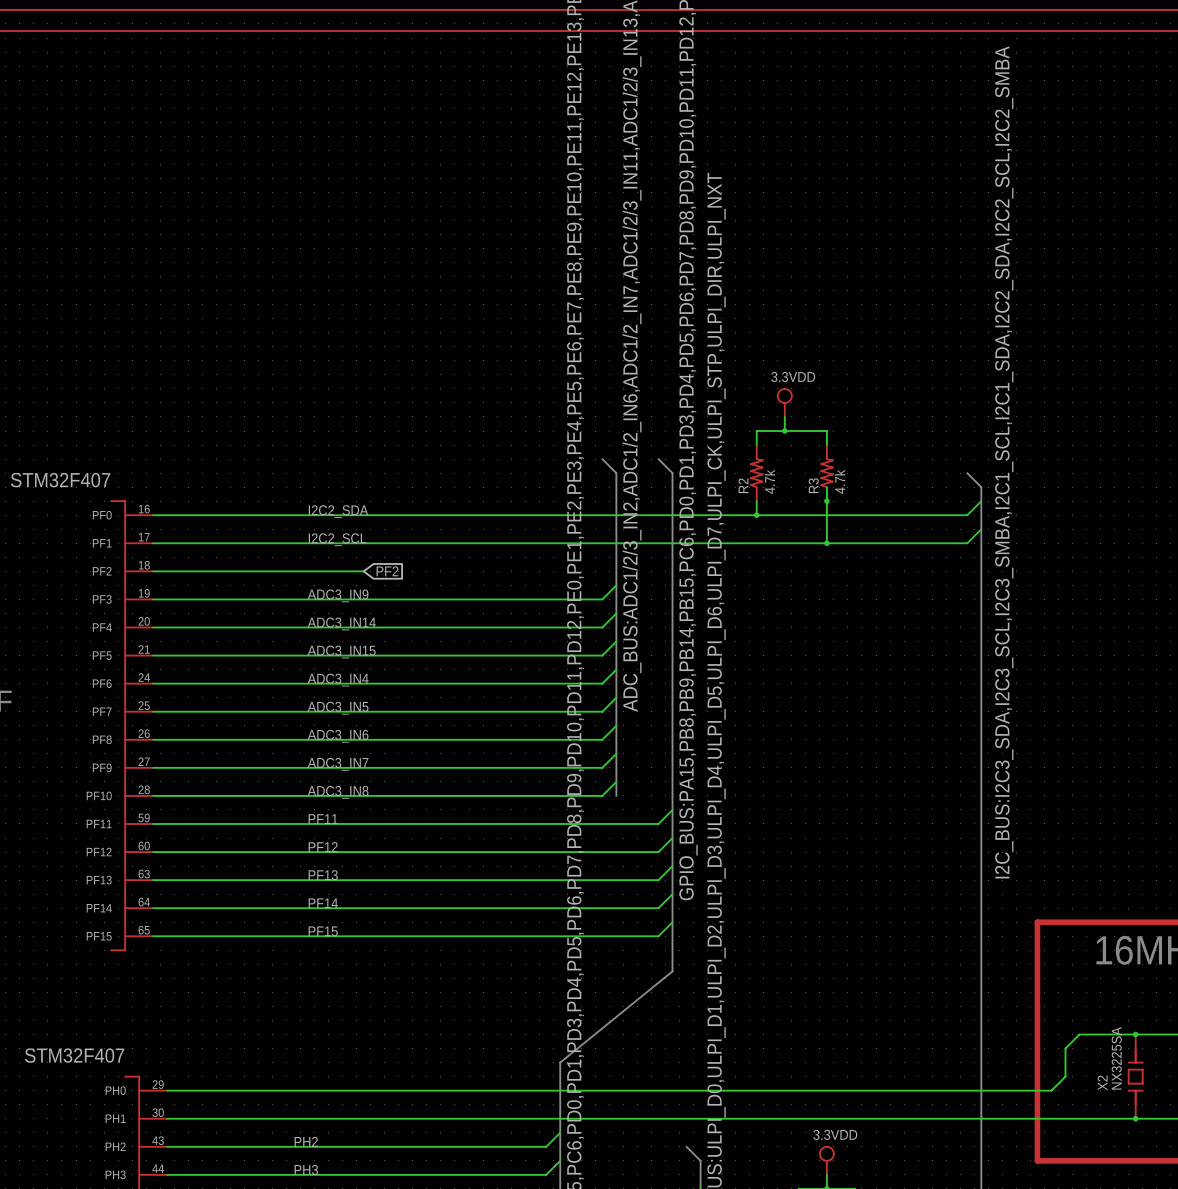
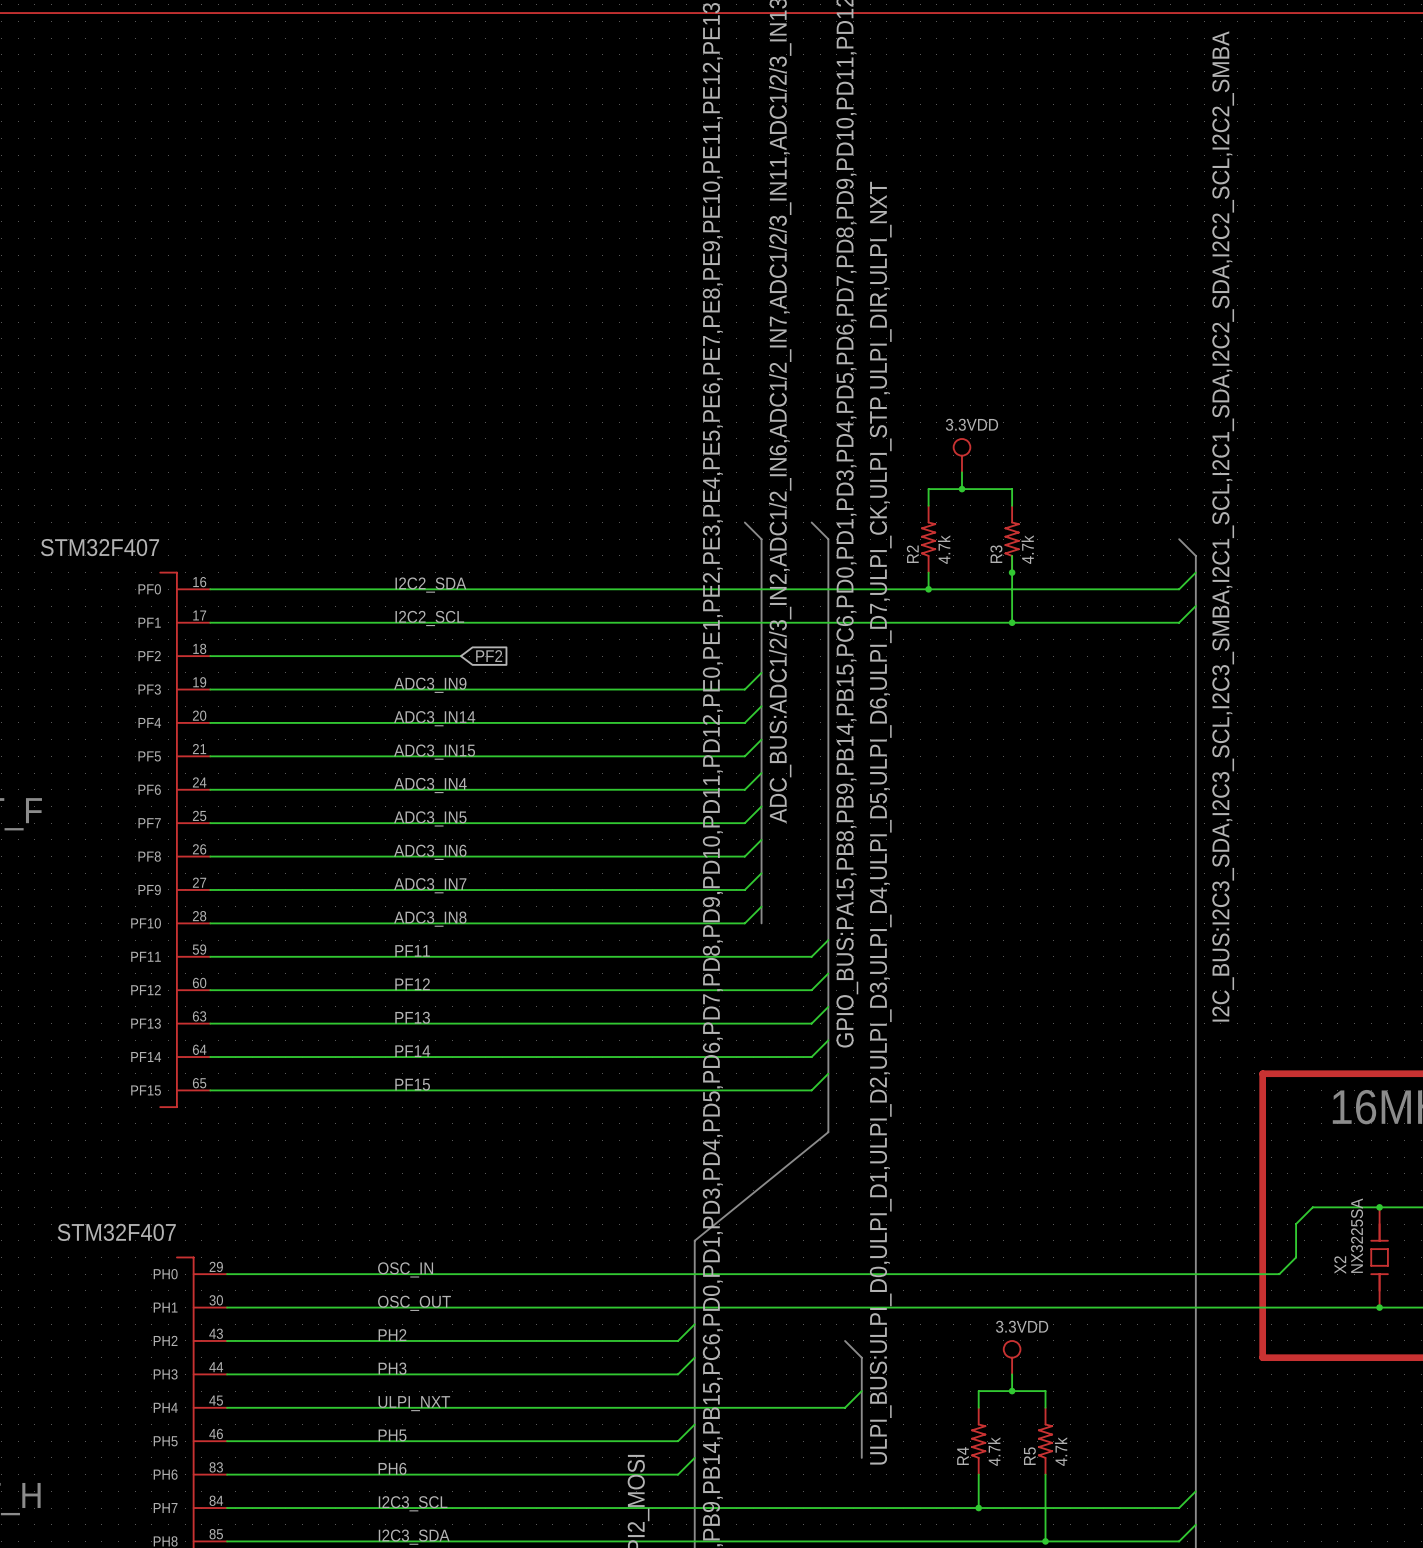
label: none -> OSC_IN (405, 1269)
label: none -> OSC_OUT (414, 1303)

